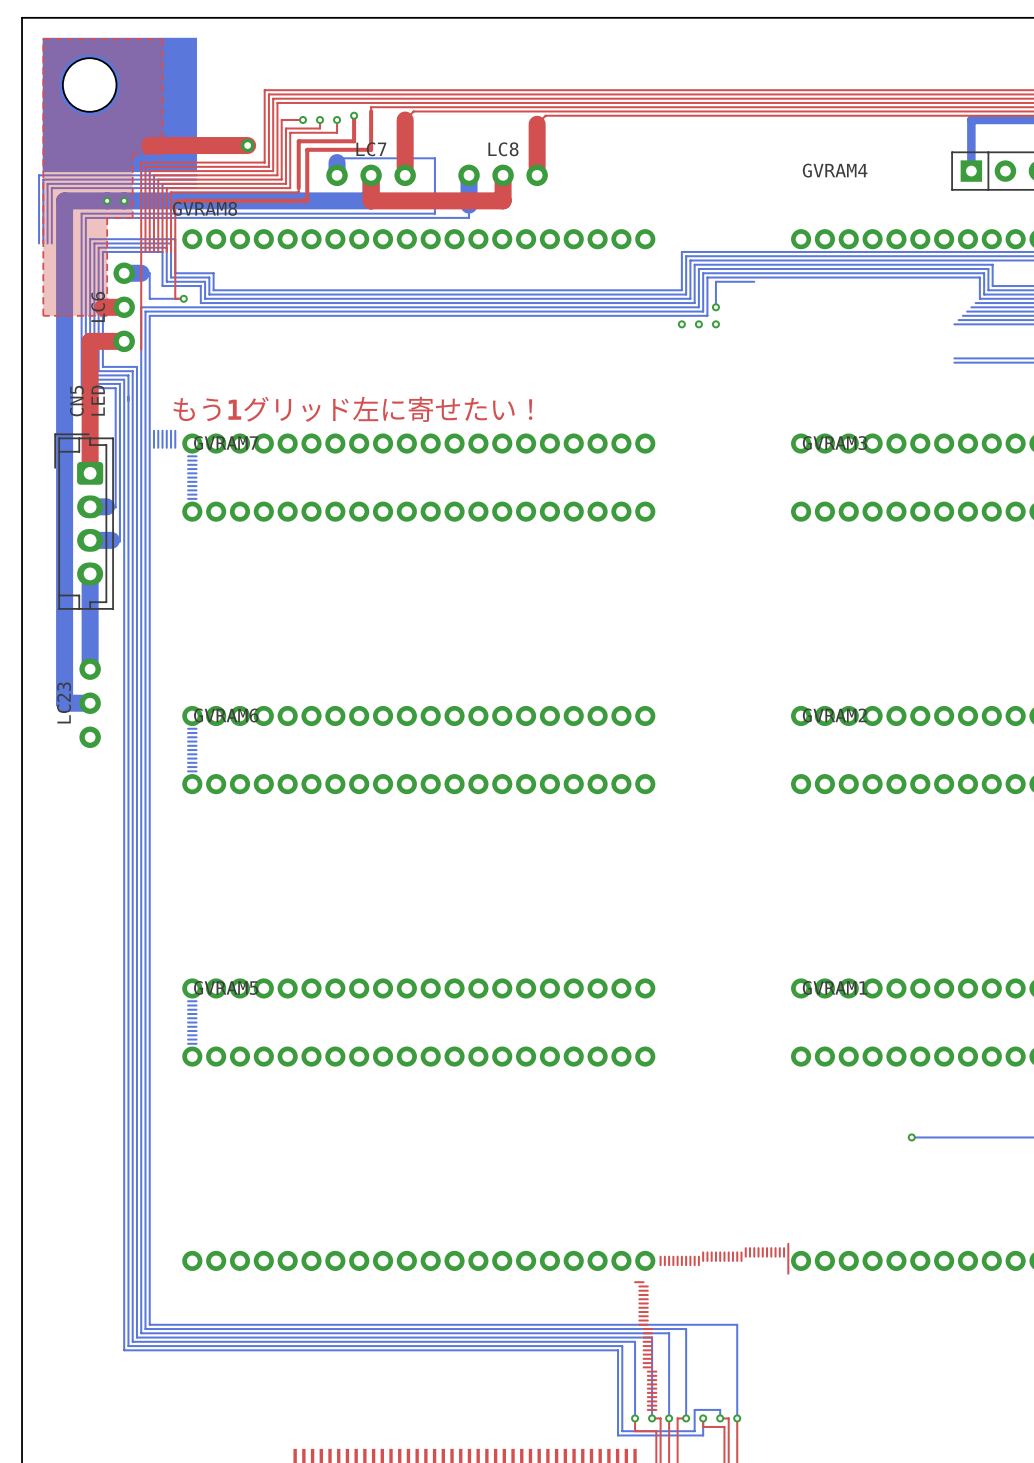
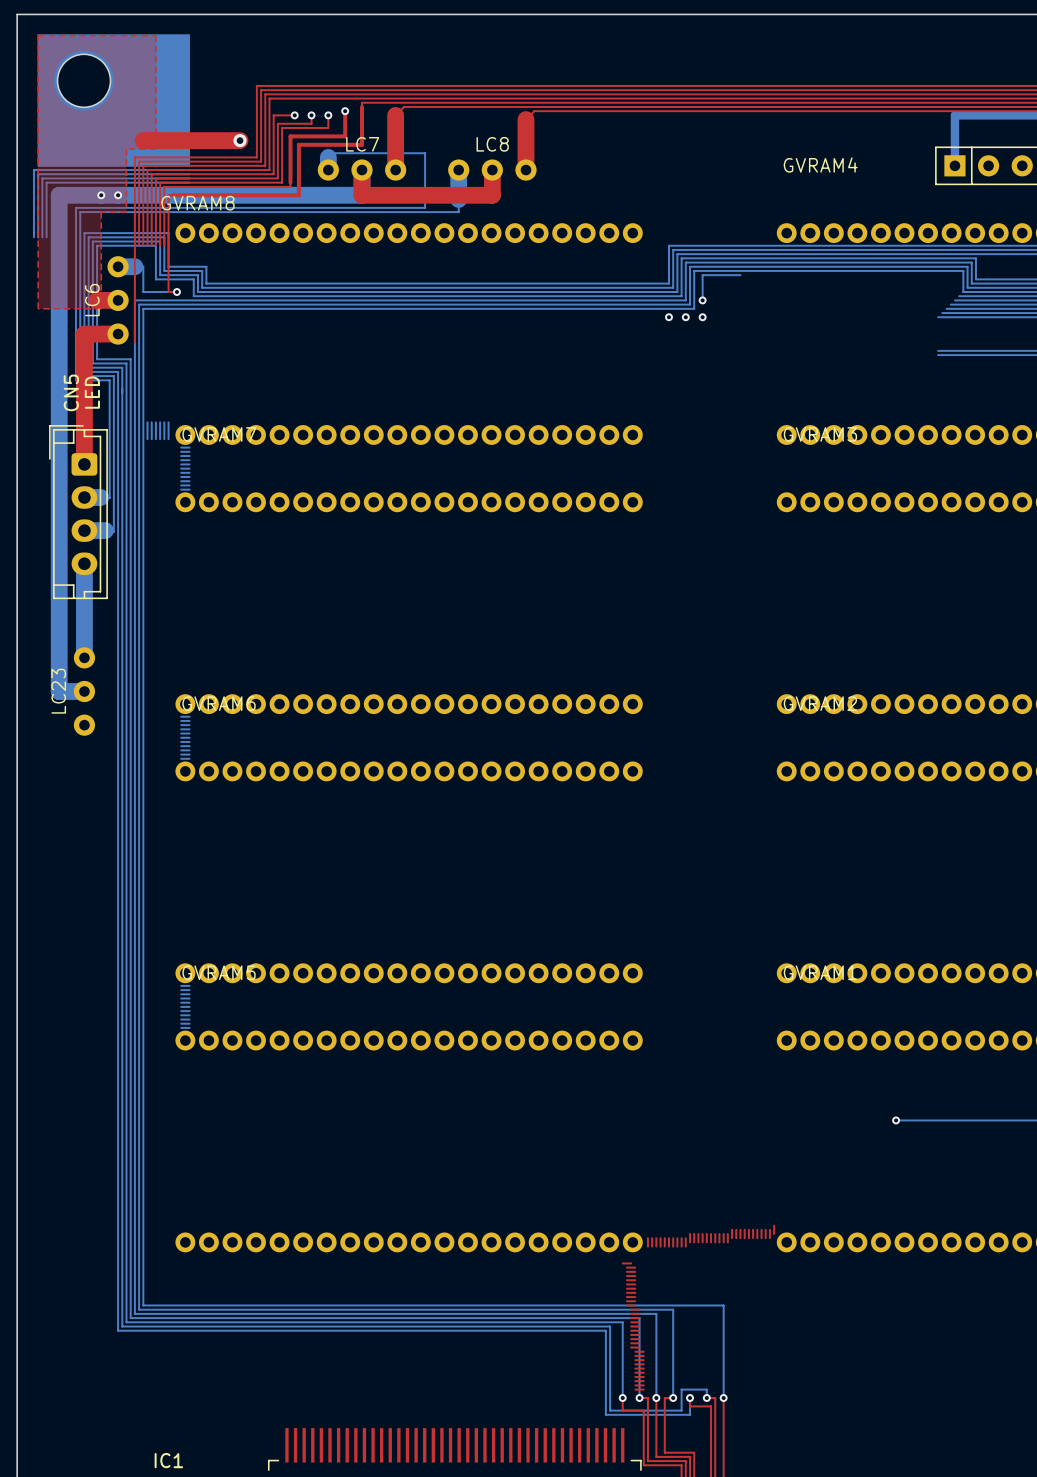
text: もう1グリッド左に寄せたい！ (352, 409) -> none
top track: (788, 1252) (788, 1273) -> none

